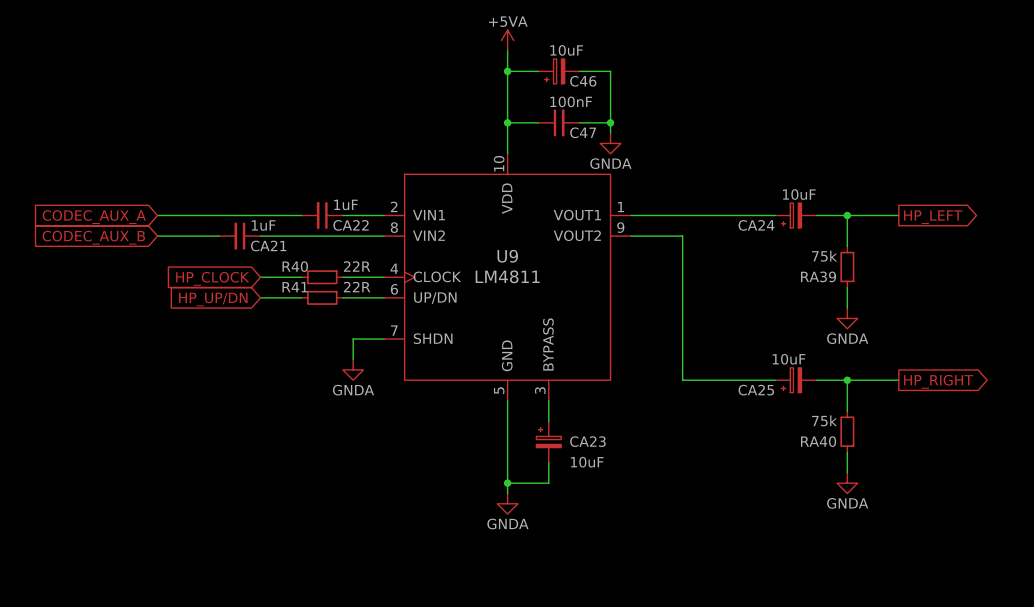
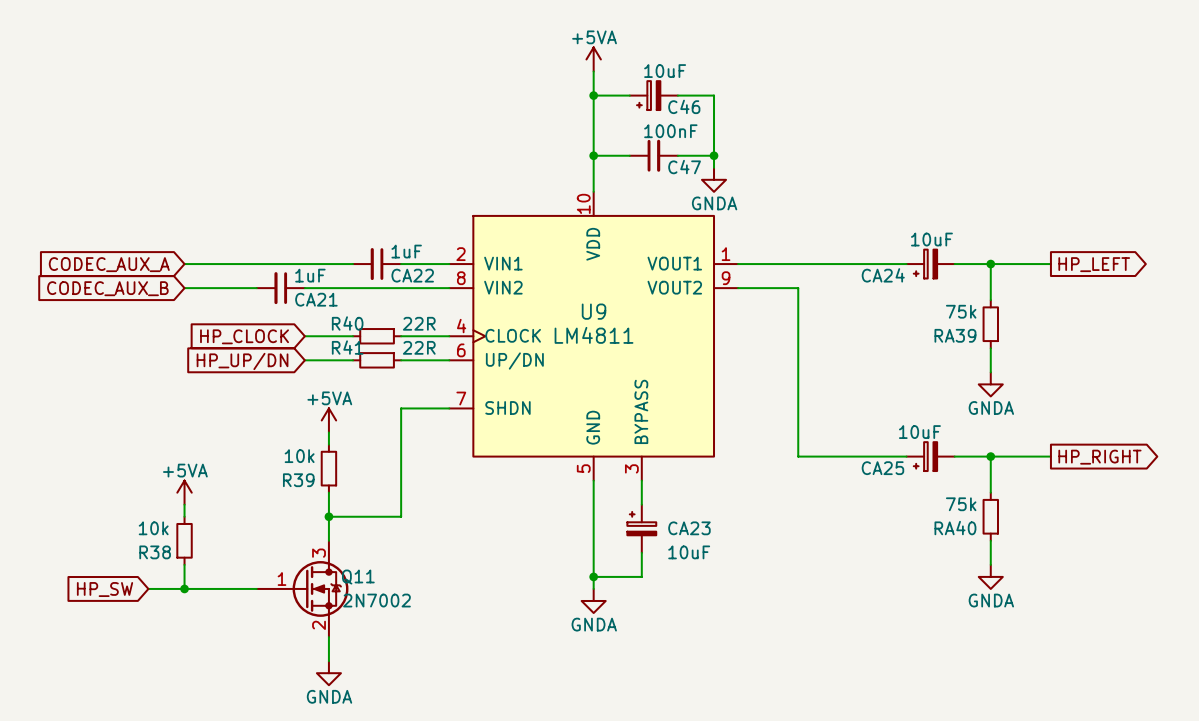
wire: (353, 339) (353, 359) -> (413, 408) (401, 408) (401, 516) (328, 516)
power symbol: none -> +5VA (328, 420)
wire: none -> (328, 432) (328, 444)
power symbol: GNDA (353, 369) -> none
R39: none -> 10k (328, 468)
power symbol: none -> +5VA (184, 492)
wire: none -> (328, 492) (328, 540)
wire: none -> (184, 504) (184, 516)
junction: none -> (328, 516)
R38: none -> 10k (184, 540)
wire: none -> (184, 564) (184, 588)
wire: none -> (148, 588) (256, 588)
junction: none -> (184, 588)
Q11: none -> 2N7002 (302, 588)
global label: none -> HP_SW (105, 589)
wire: none -> (328, 637) (328, 661)
power symbol: none -> GNDA (328, 673)

